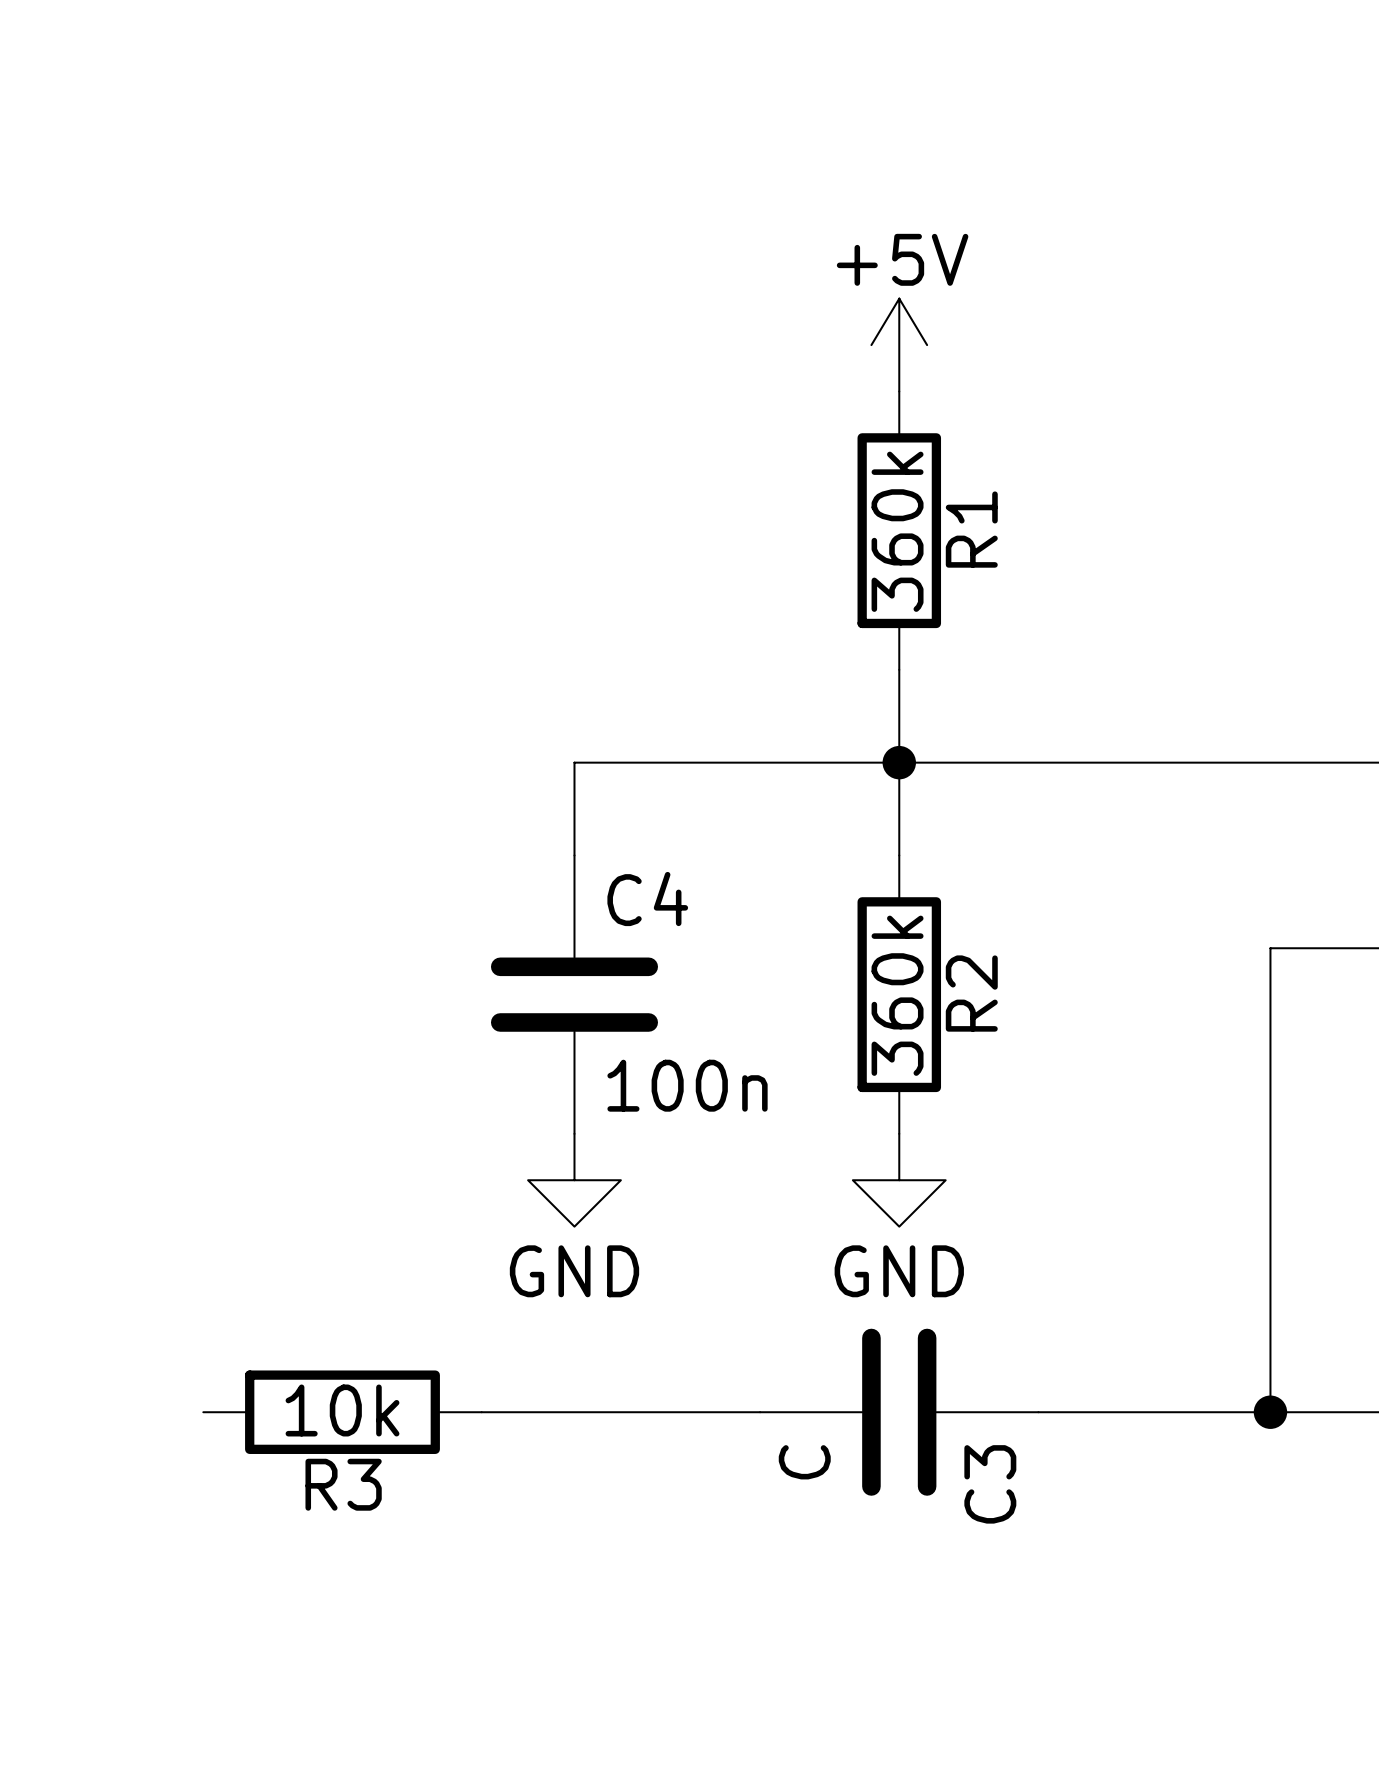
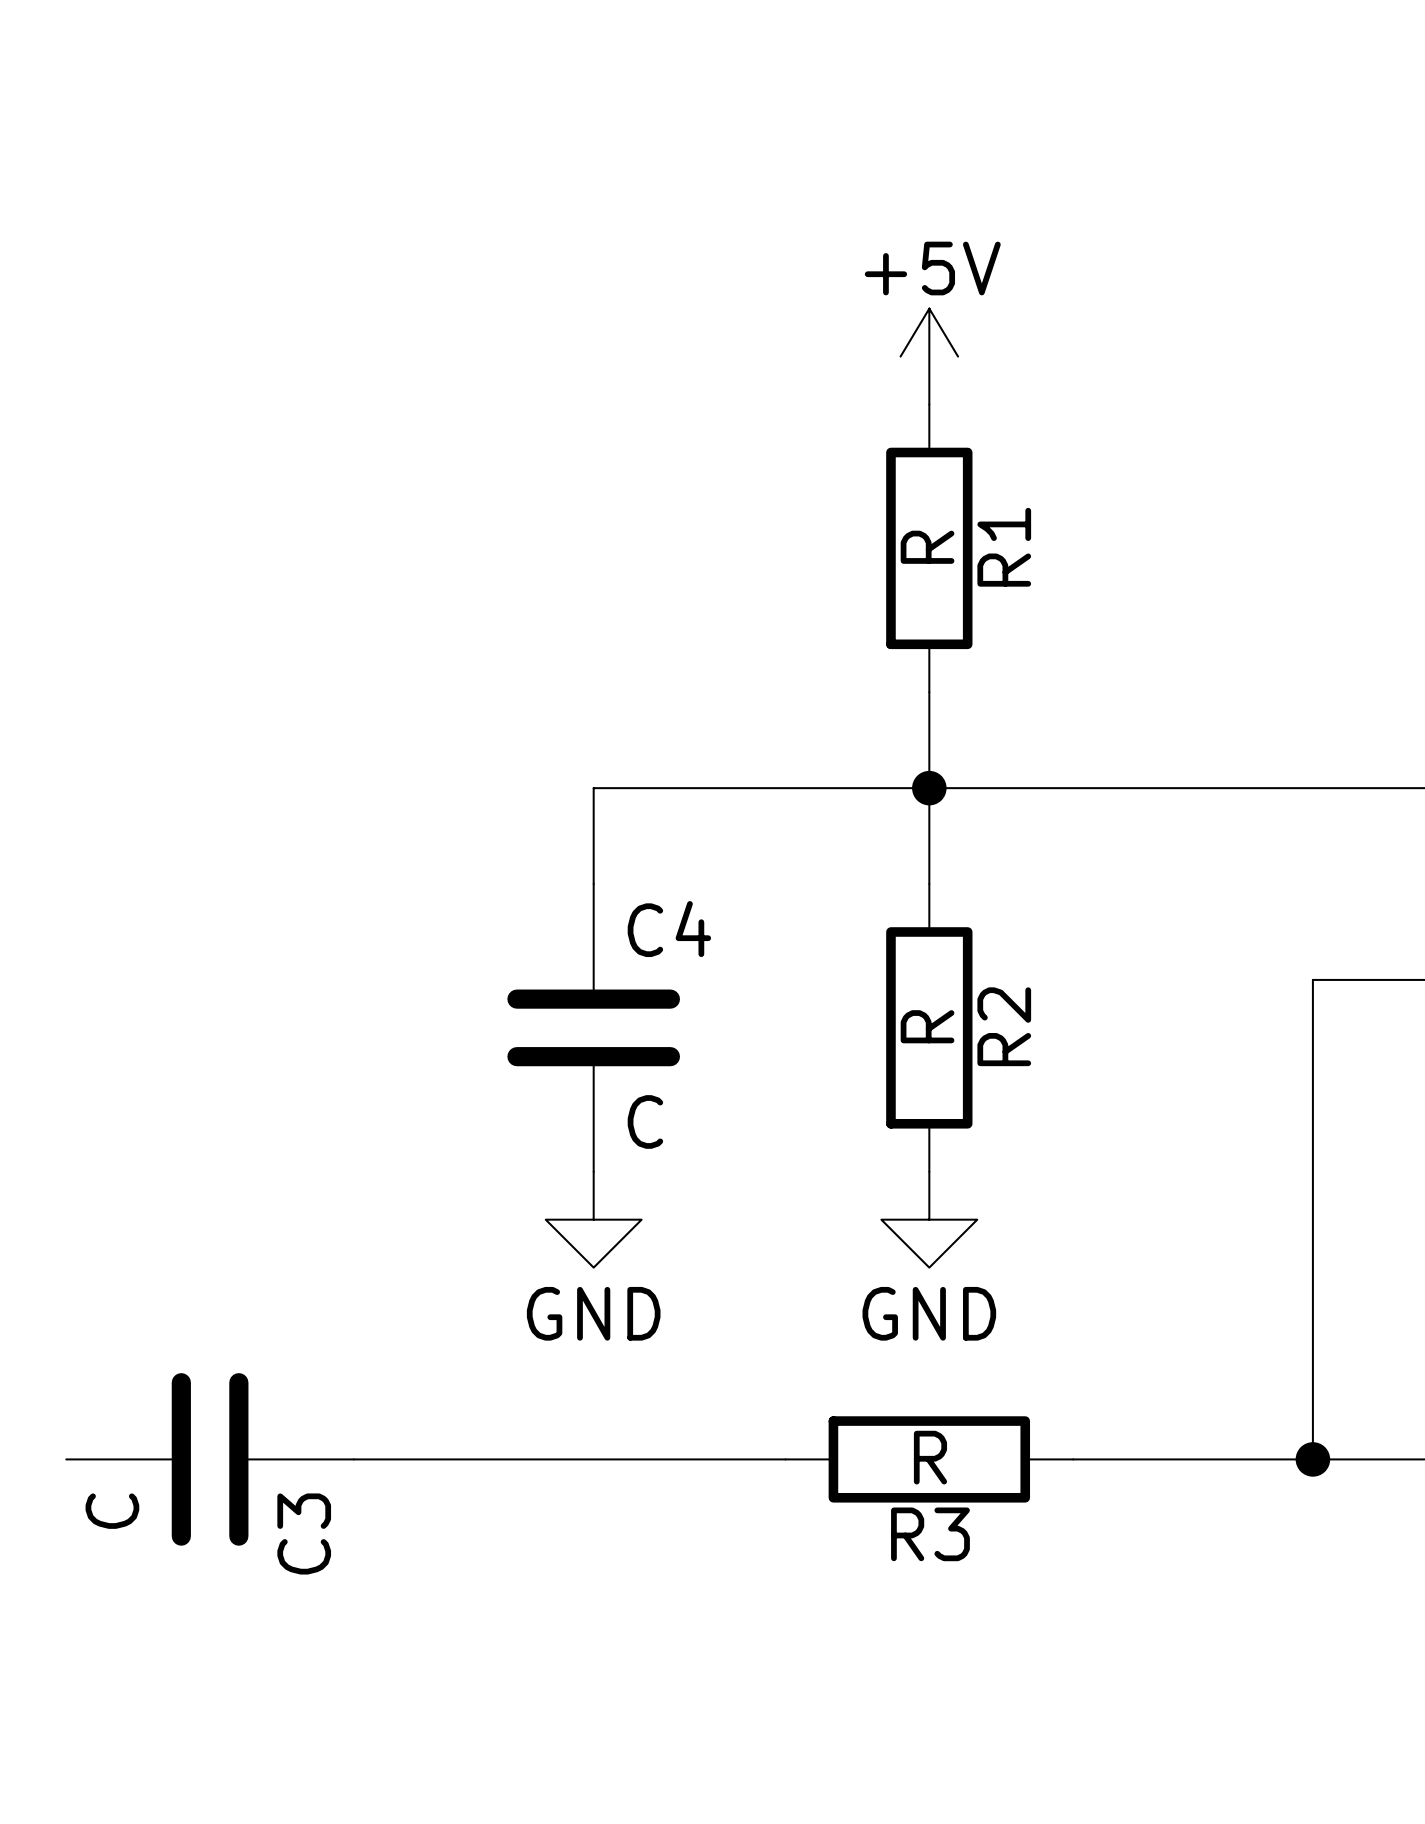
R1 value: 360k (897, 531) -> R (927, 547)
R2 value: 360k (897, 995) -> R (927, 1026)
C4 value: 100n (687, 1085) -> C (645, 1121)
R3 value: 10k (342, 1410) -> R (930, 1457)
wire: none -> (353, 1459) (497, 1459)
R3 position: (342, 1412) -> (929, 1459)
C3 position: (899, 1412) -> (210, 1459)

